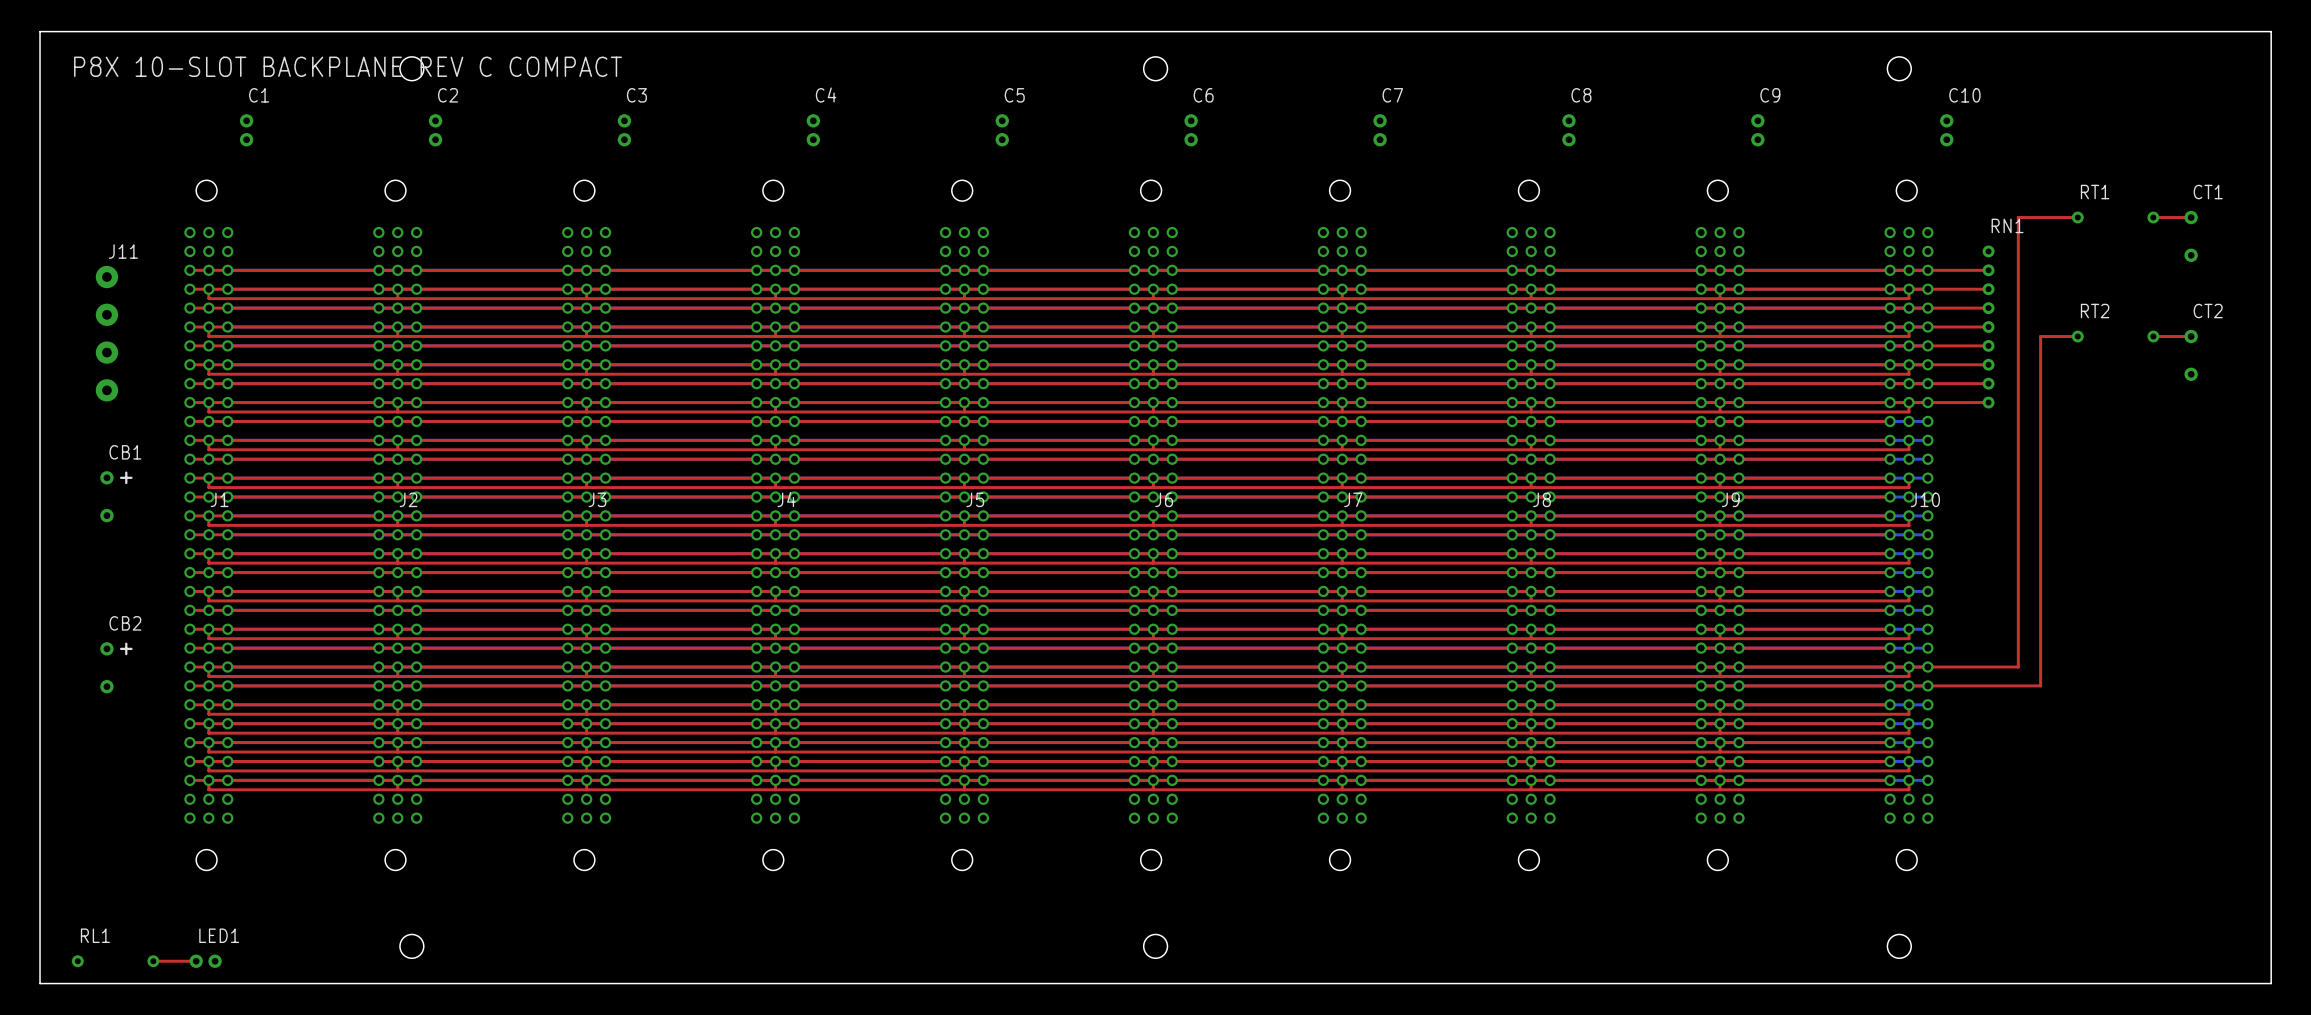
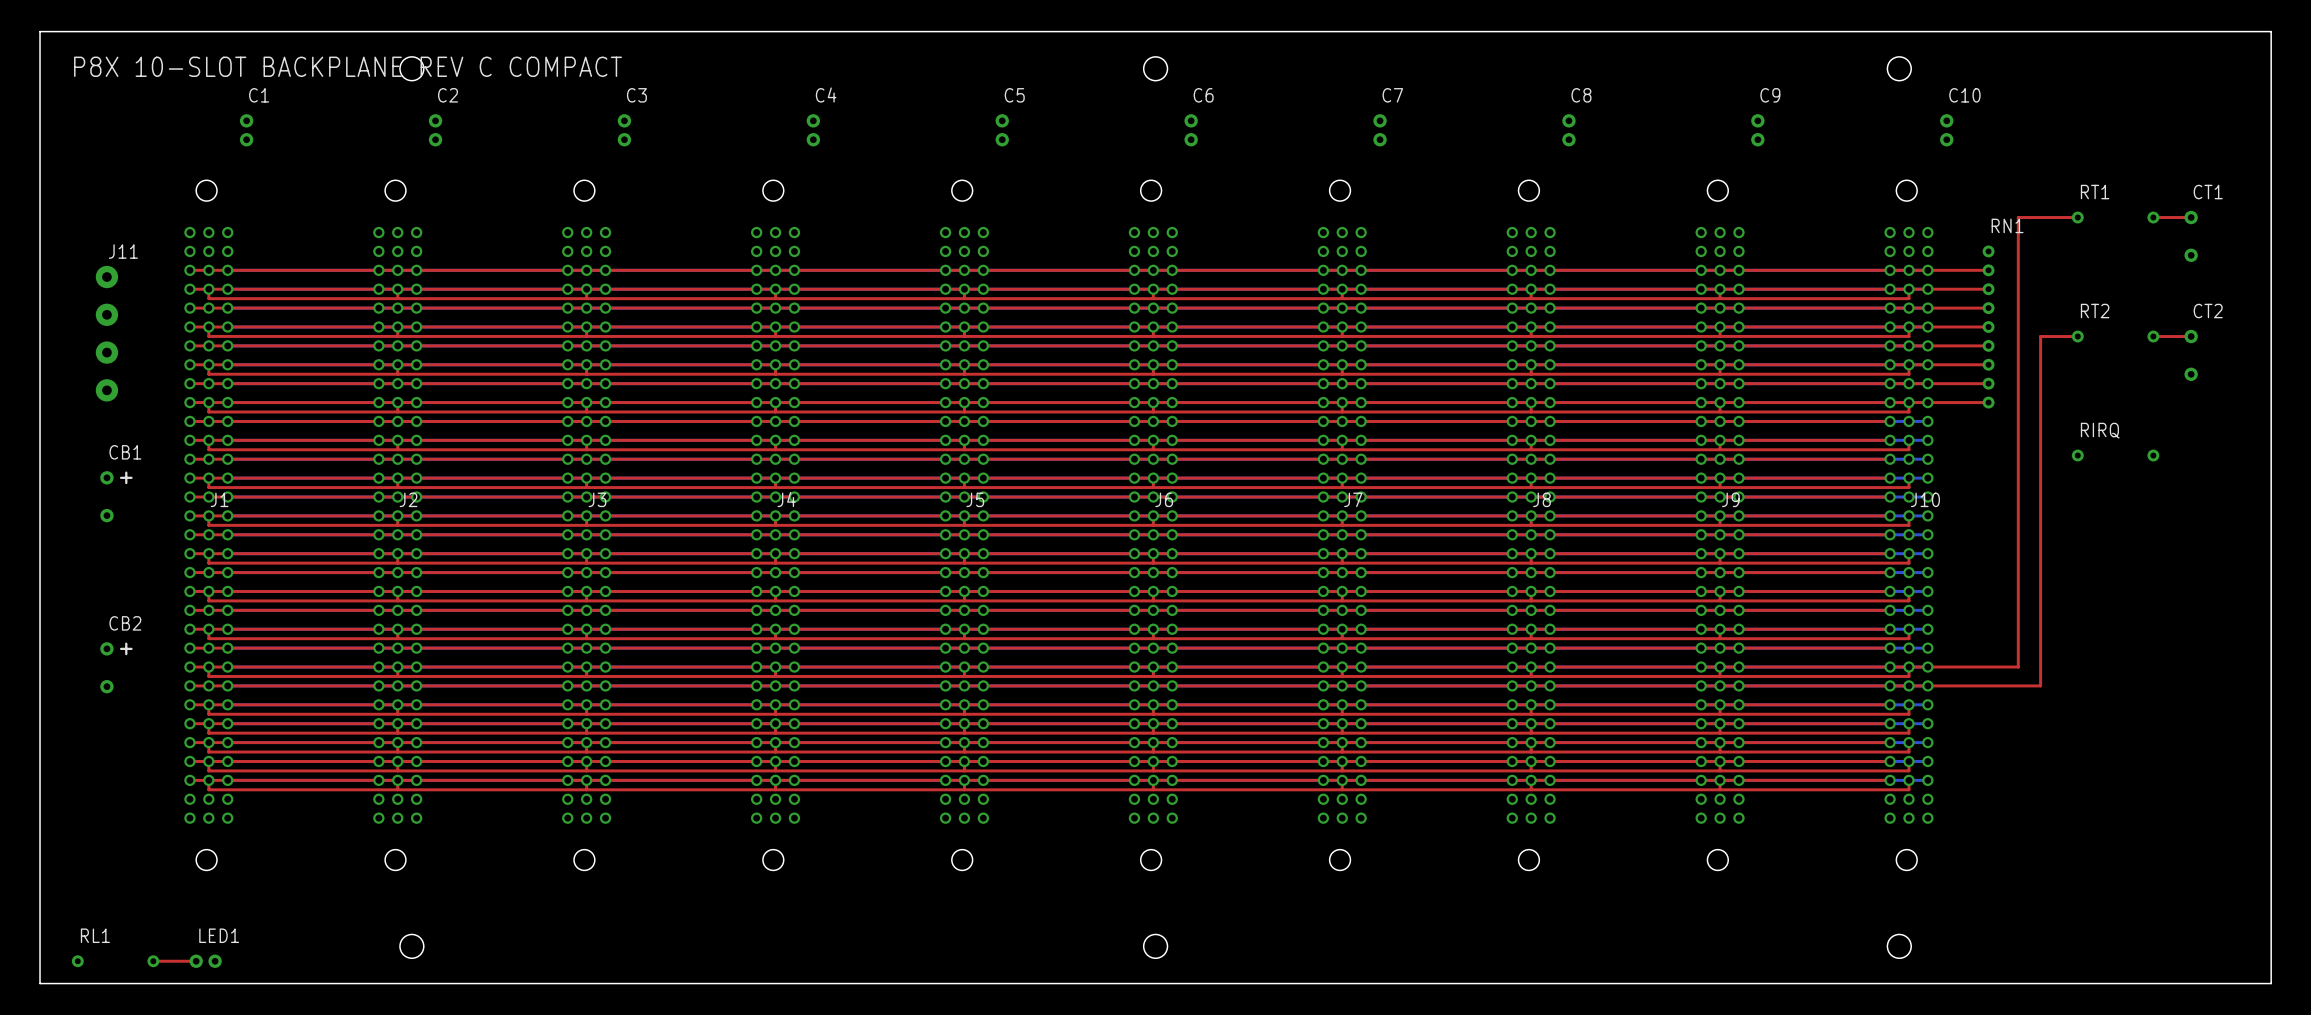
RIRQ: none -> (2115, 455)

